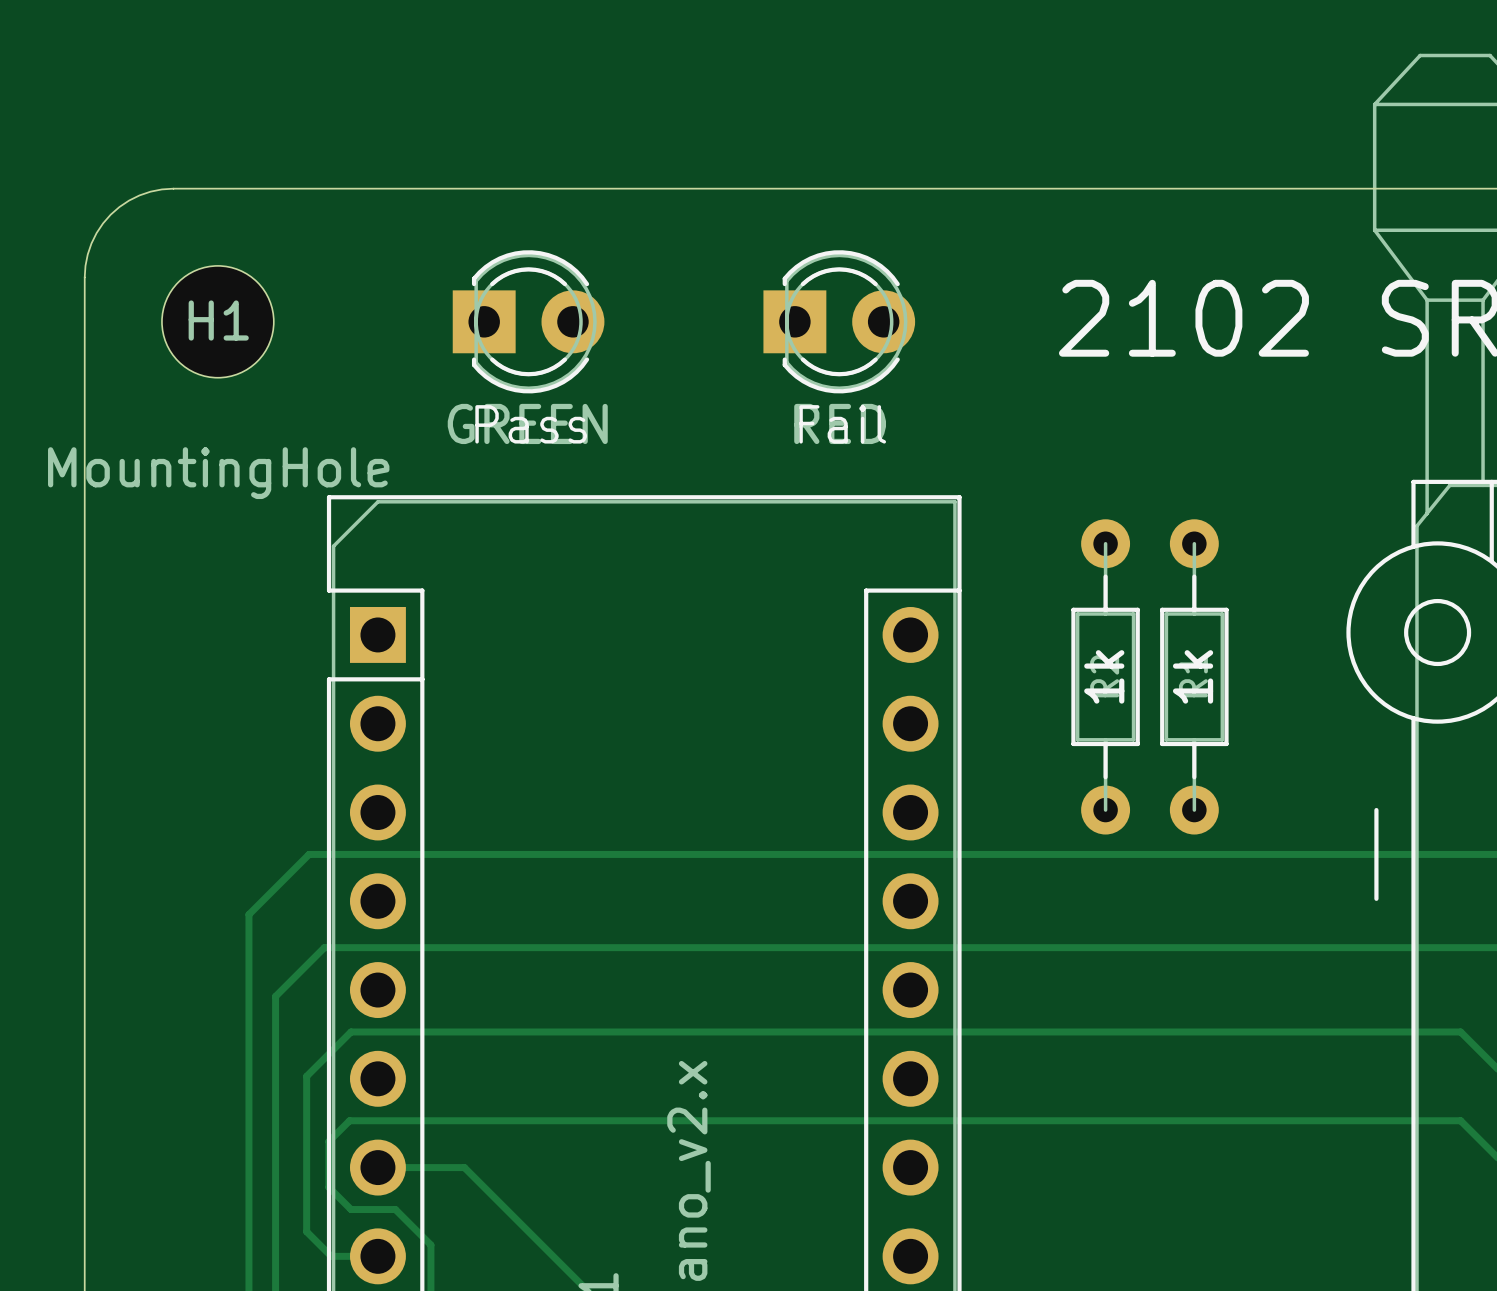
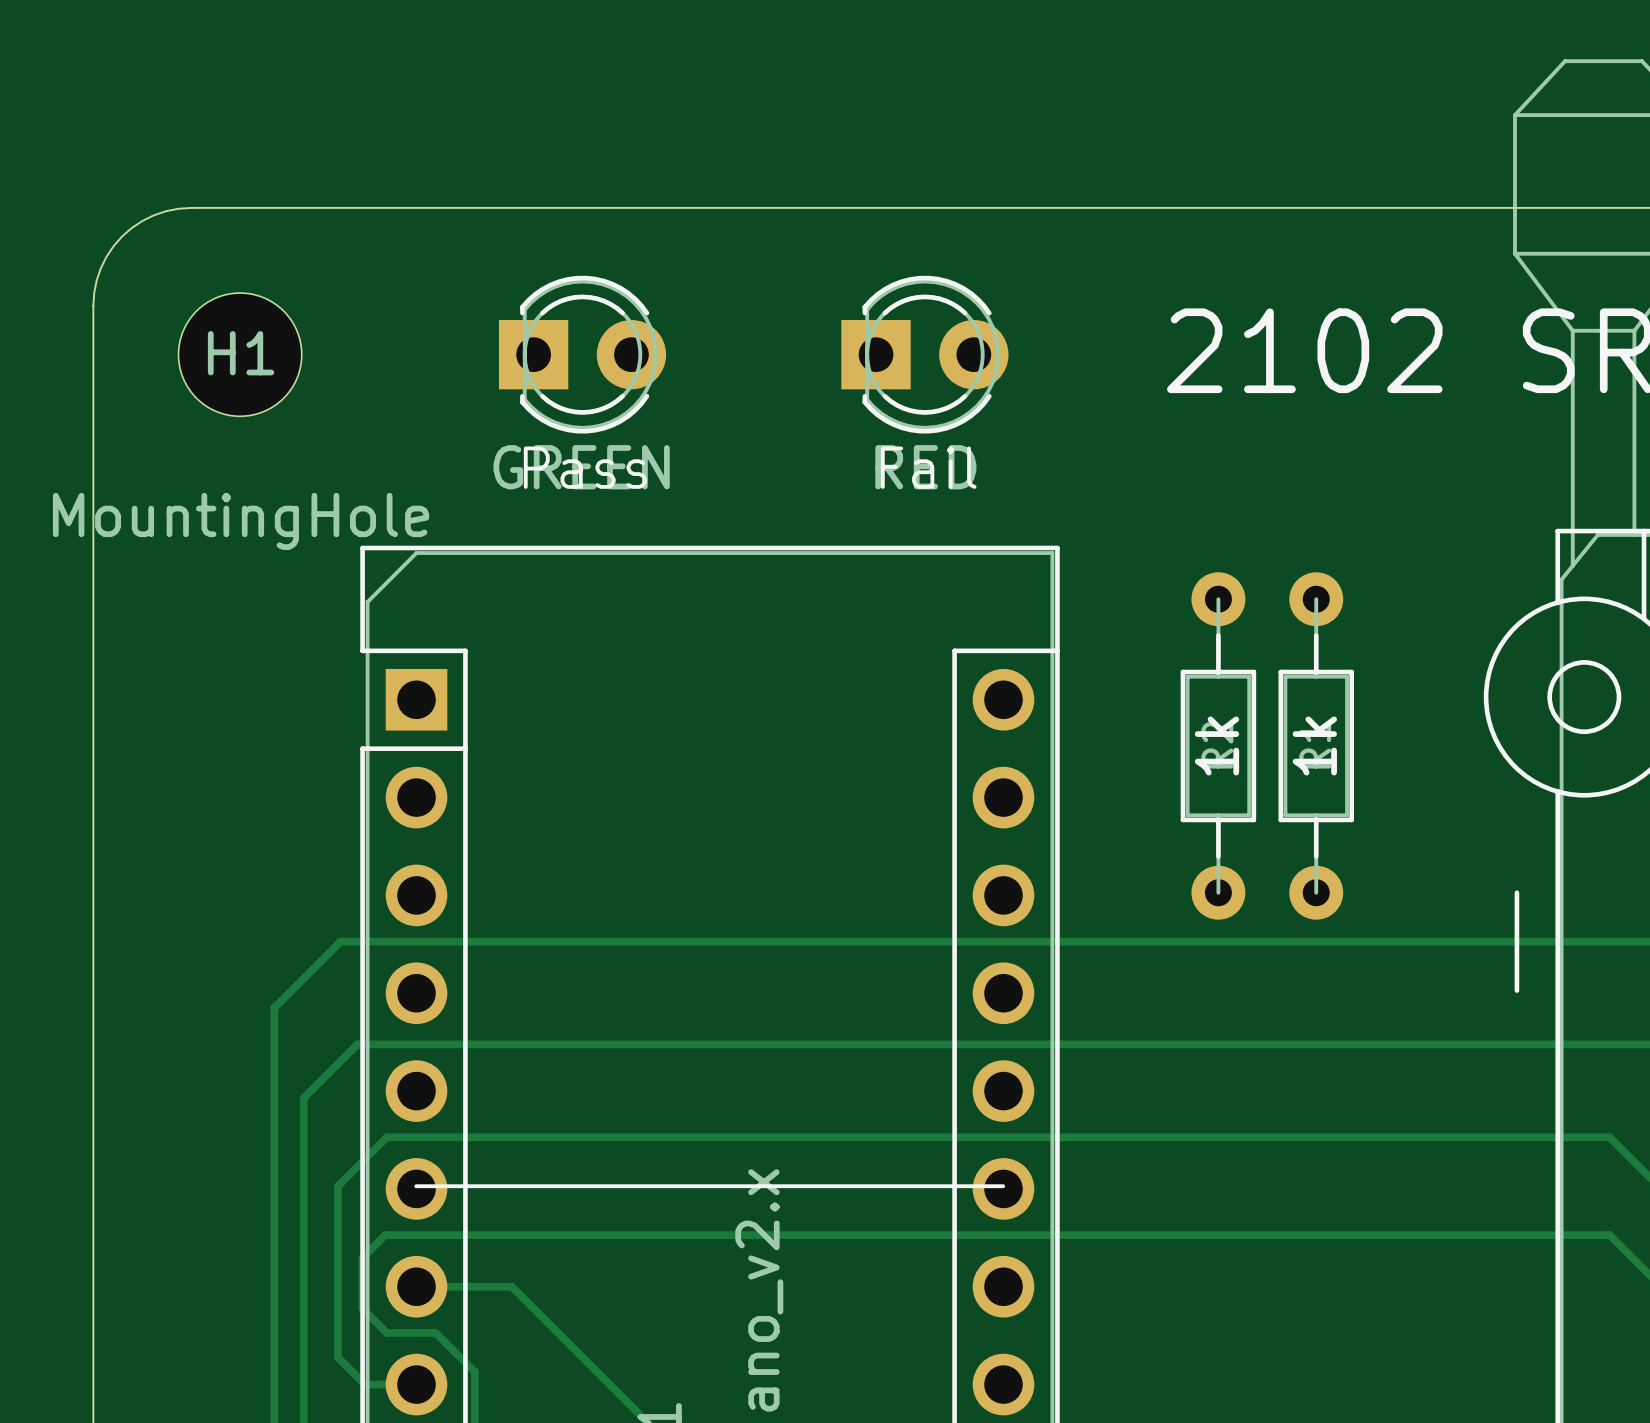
line: none -> (416, 1186) (1003, 1186)

